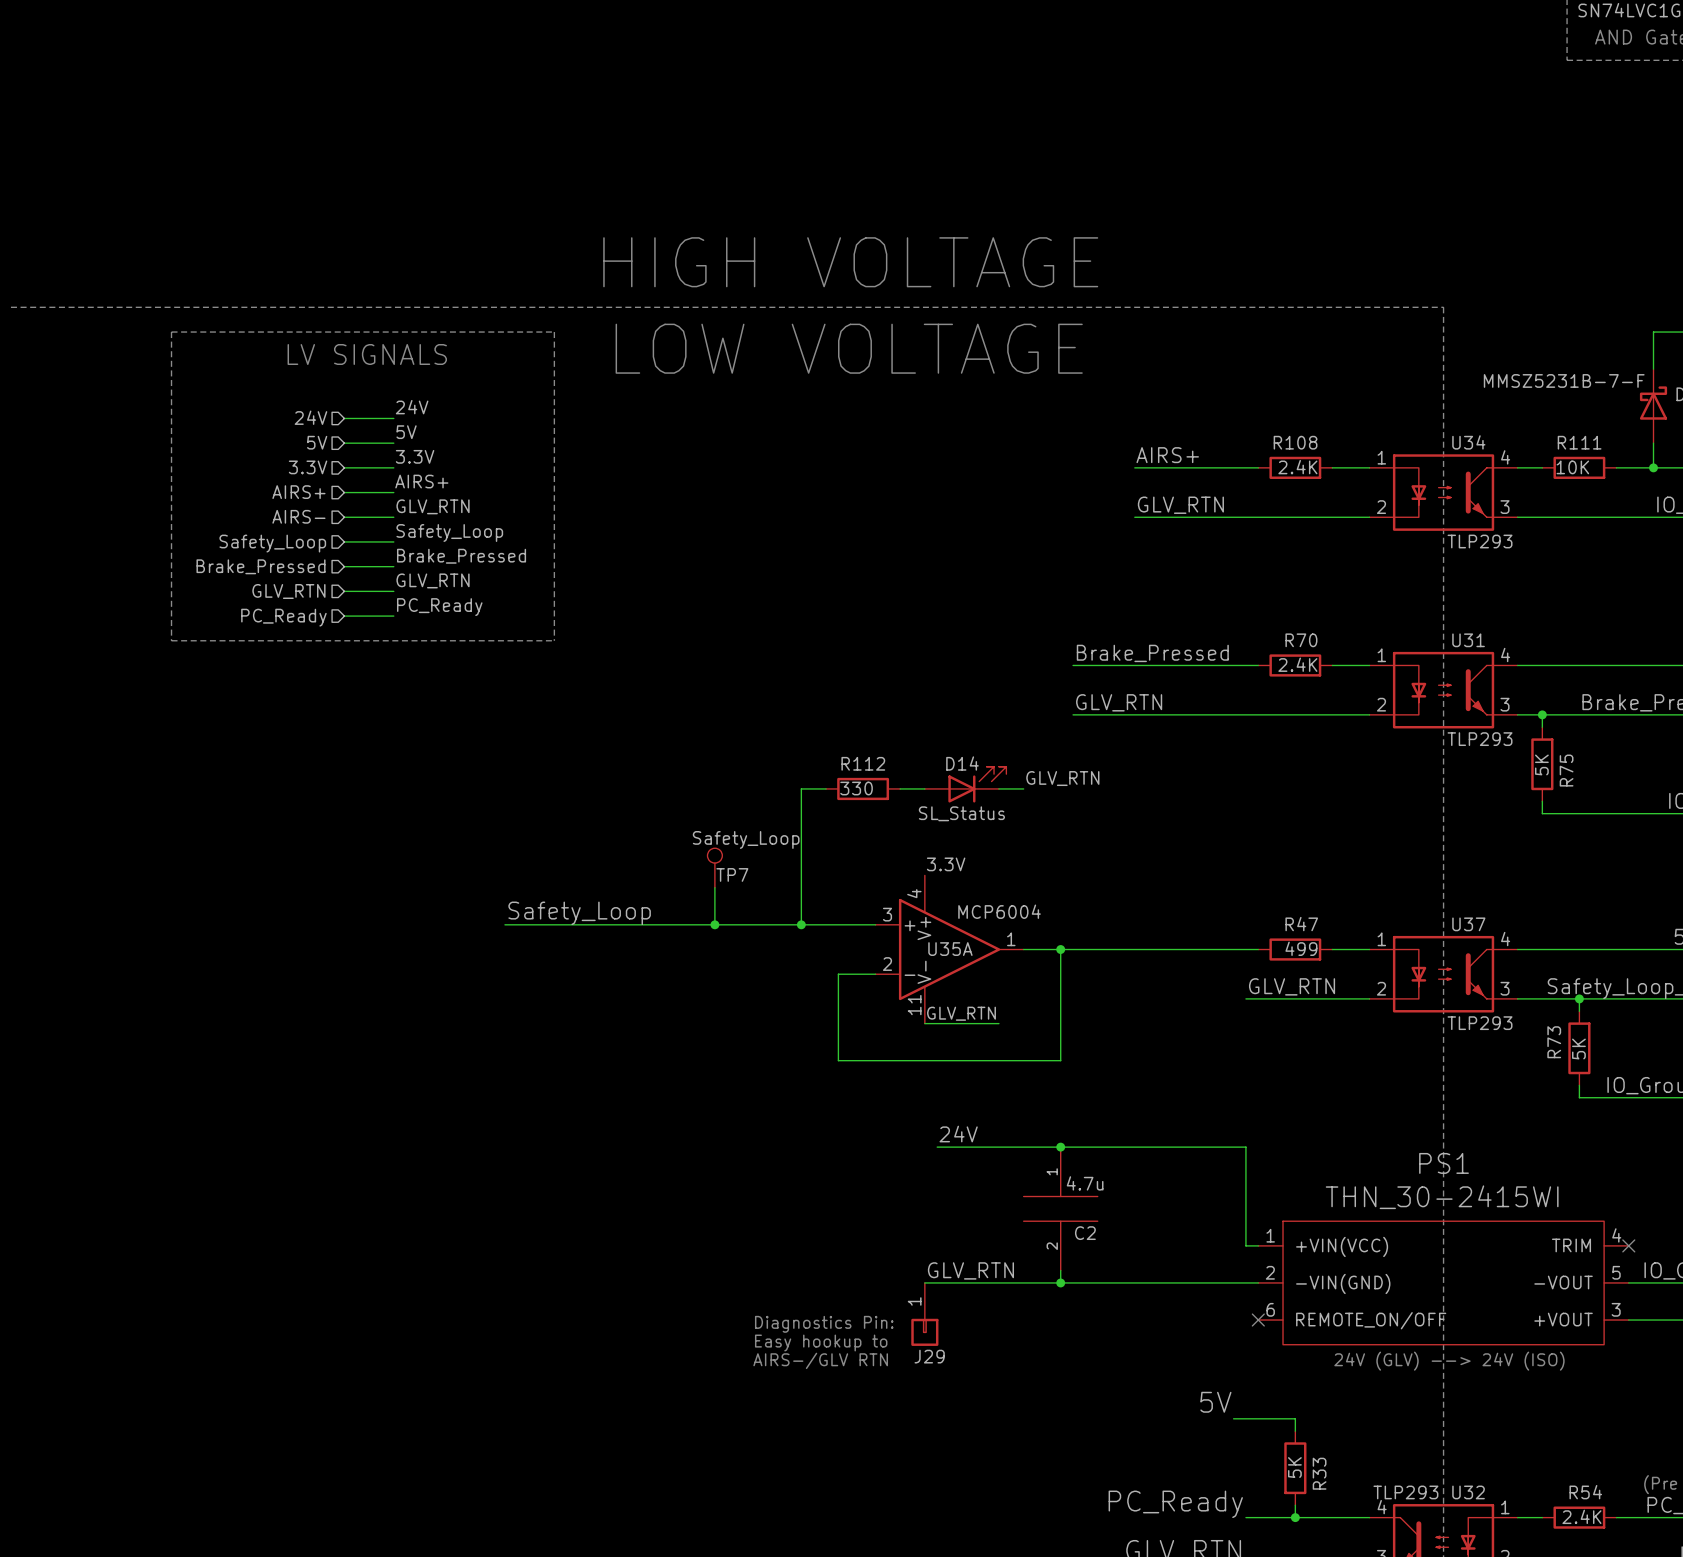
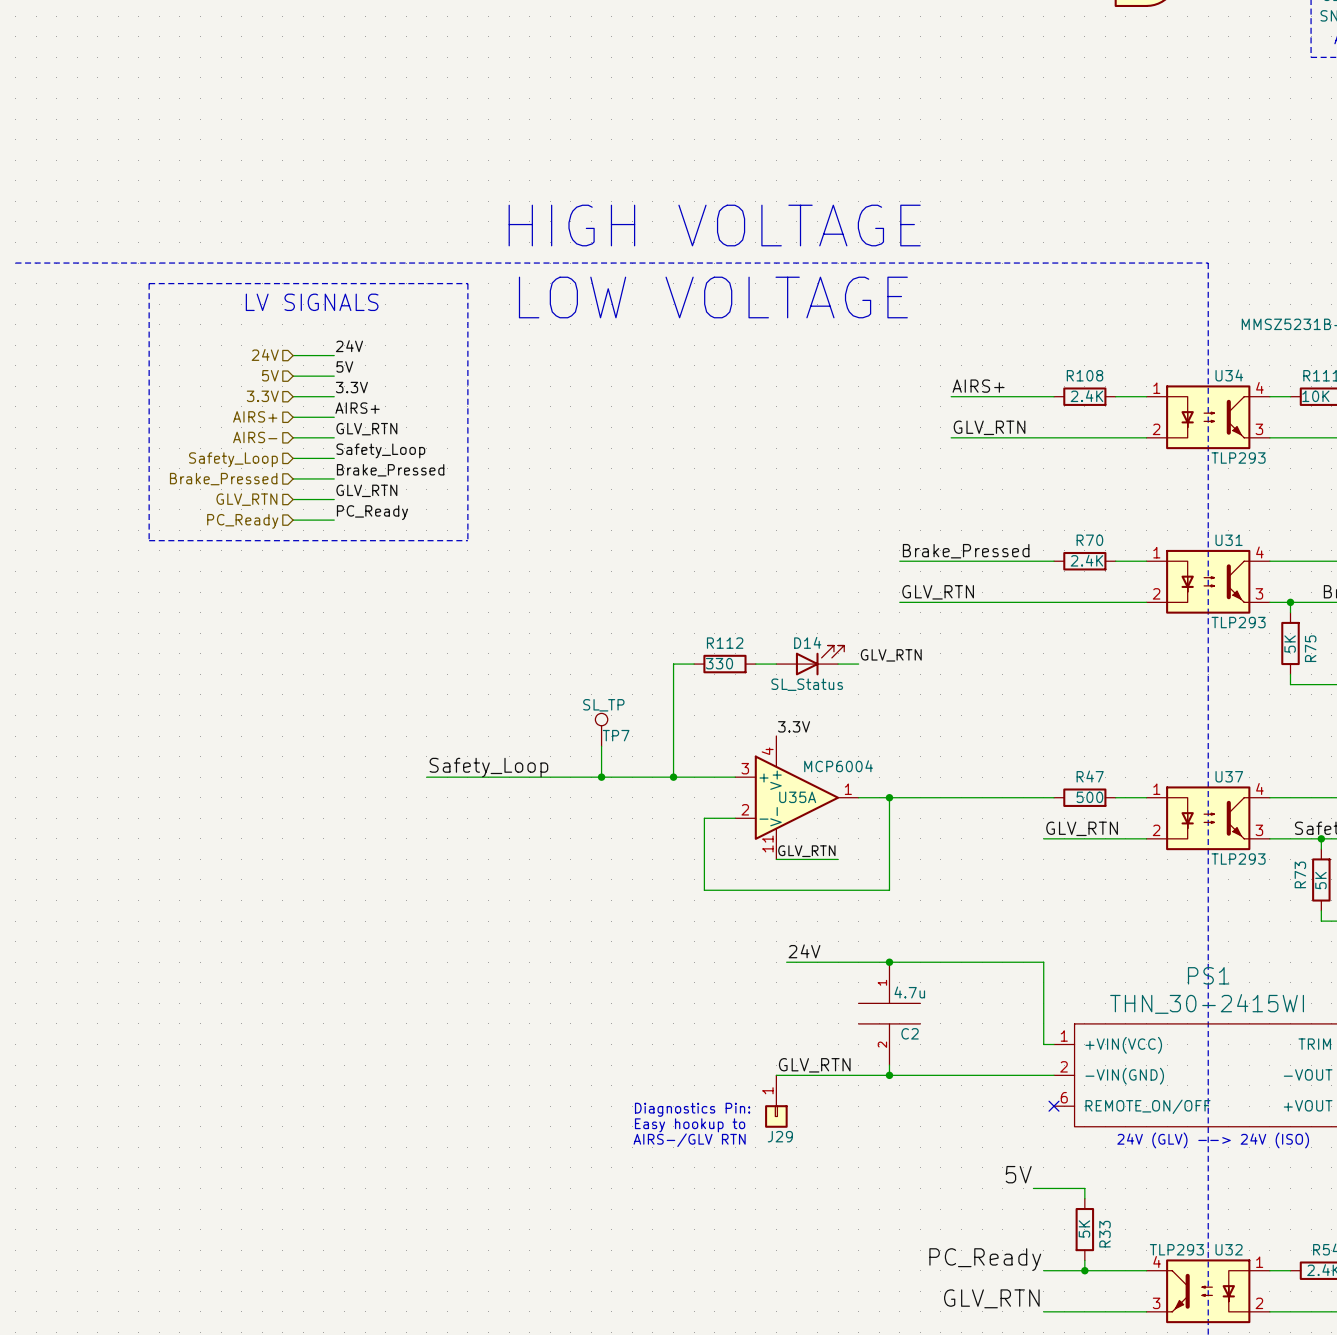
TP7 value: Safety_Loop (746, 839) -> SL_TP (603, 705)
R47 value: 499 (1301, 948) -> 500 (1089, 797)

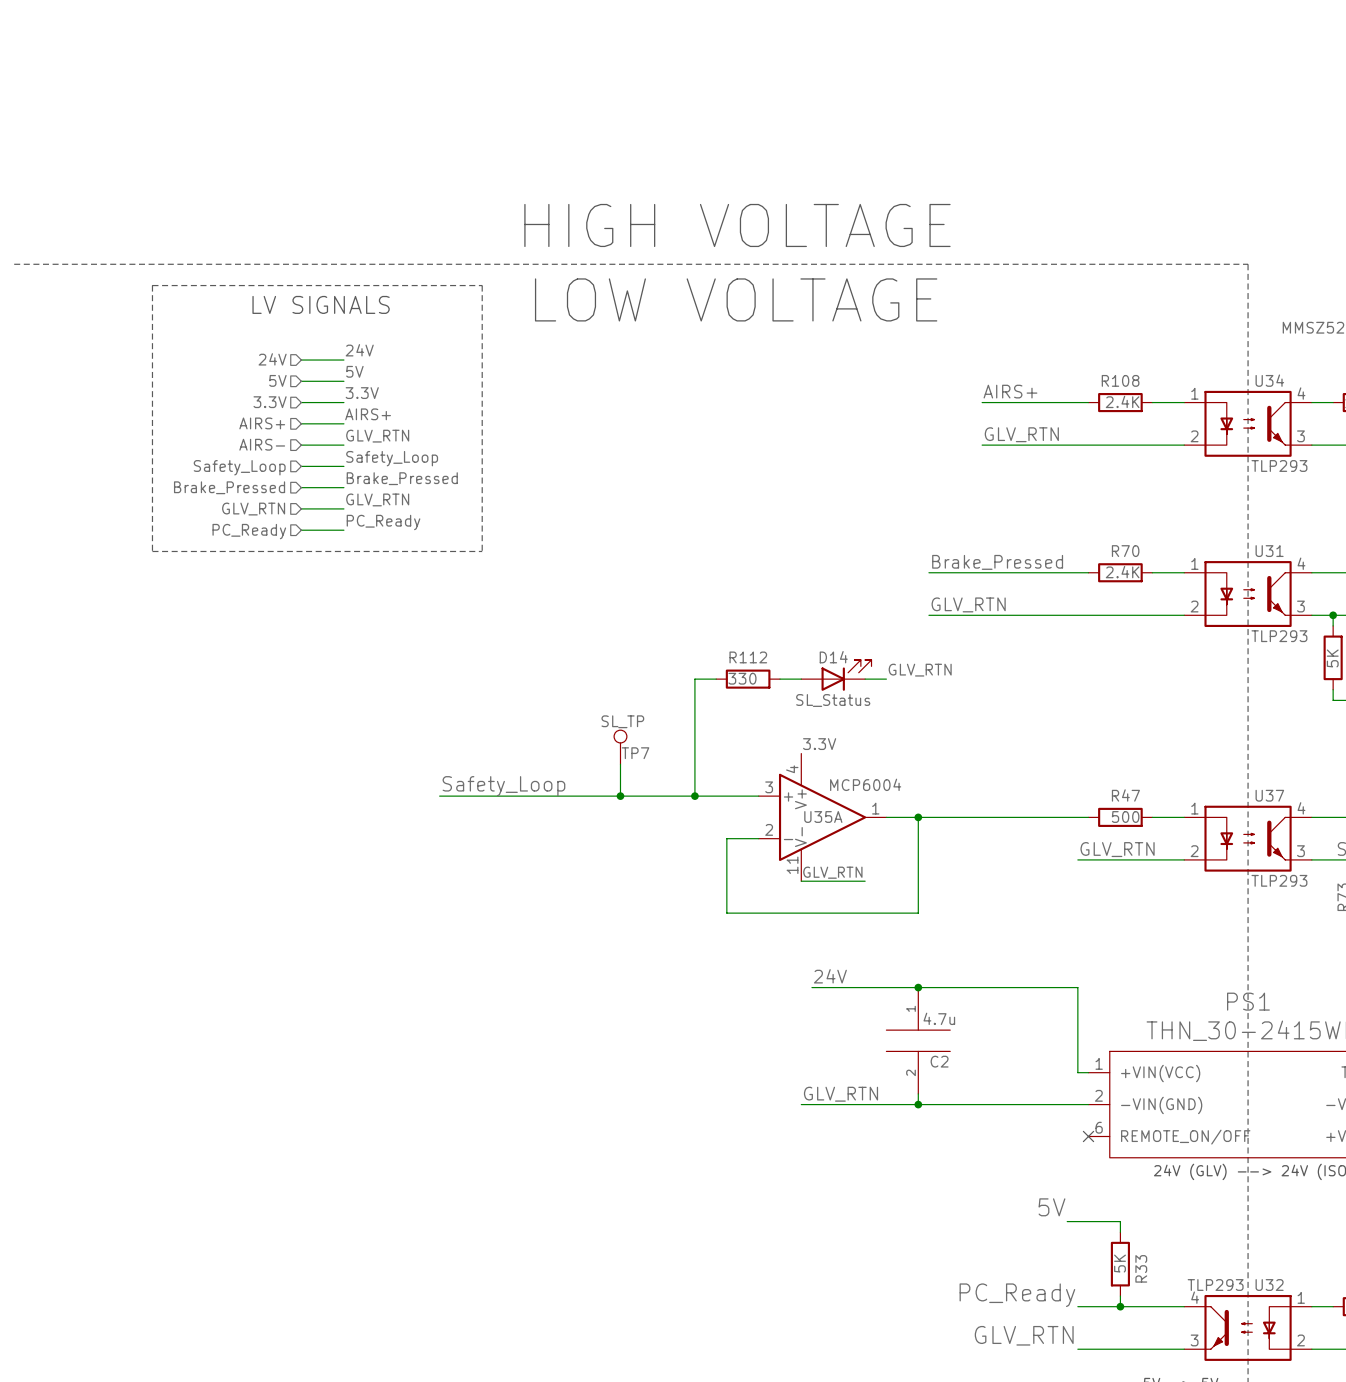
J29: (776, 1101) -> none
text: Diagnostics Pin: (692, 1109) -> none
text: Easy hookup to (690, 1125) -> none
text: AIRS-/GLV RTN (689, 1140) -> none

